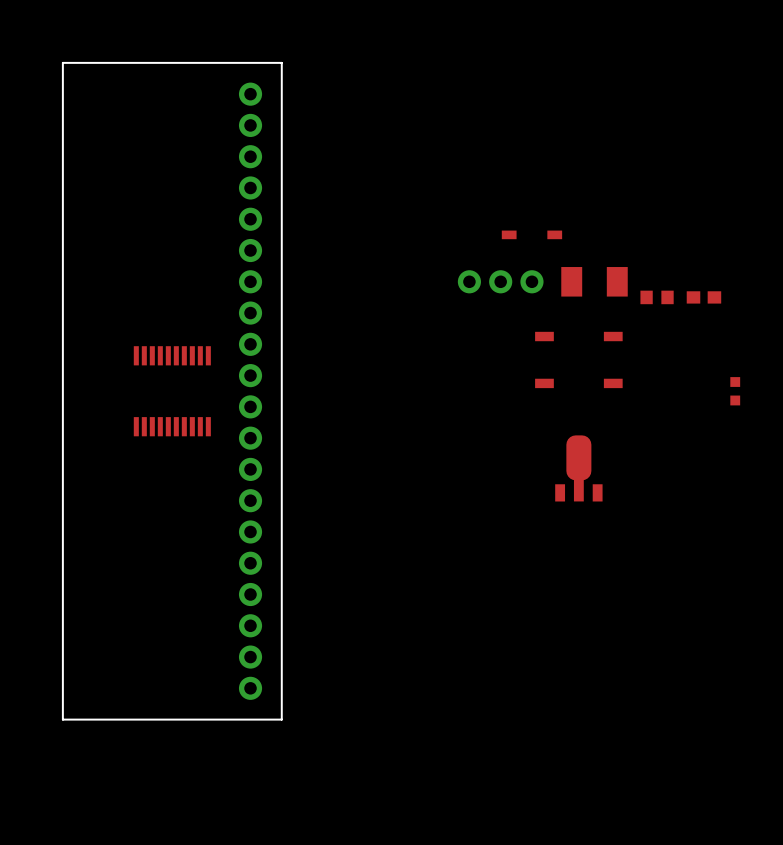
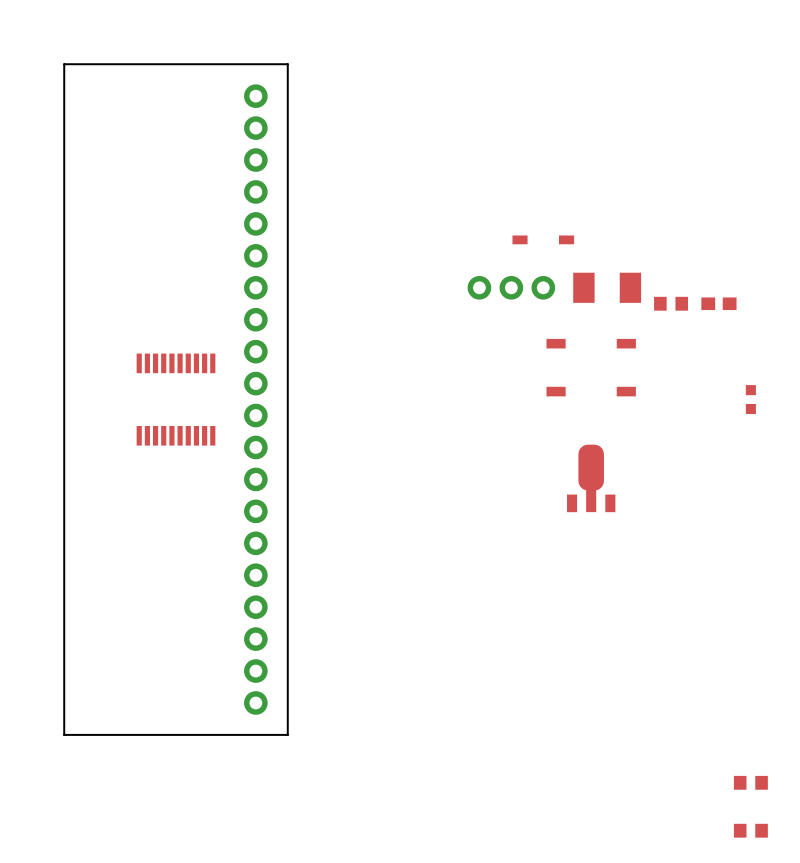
part: none -> (750, 782)
part: none -> (750, 830)

